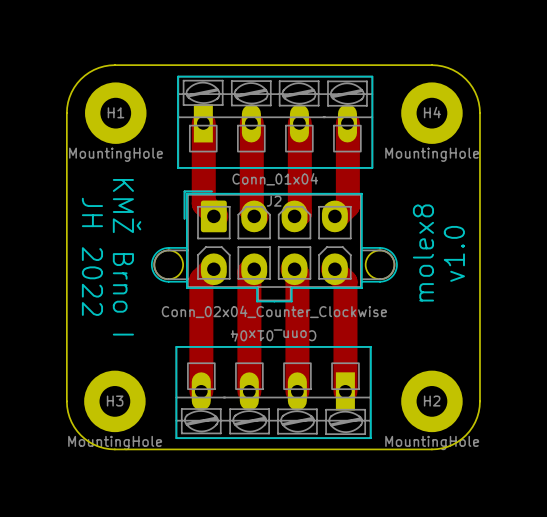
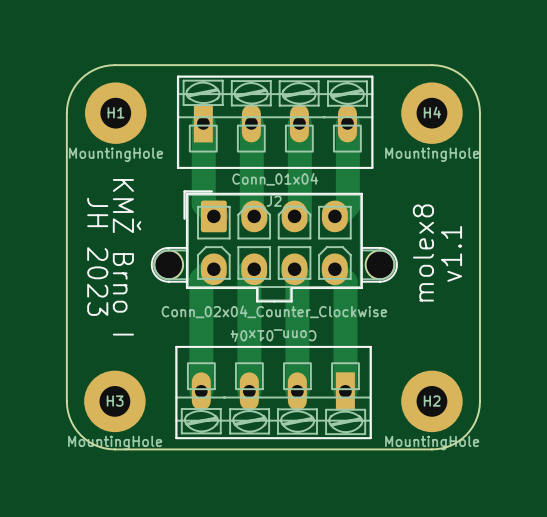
text: v1.0 (454, 253) -> v1.1 (451, 253)
text: JH 2022 (92, 256) -> JH 2023 (97, 256)

